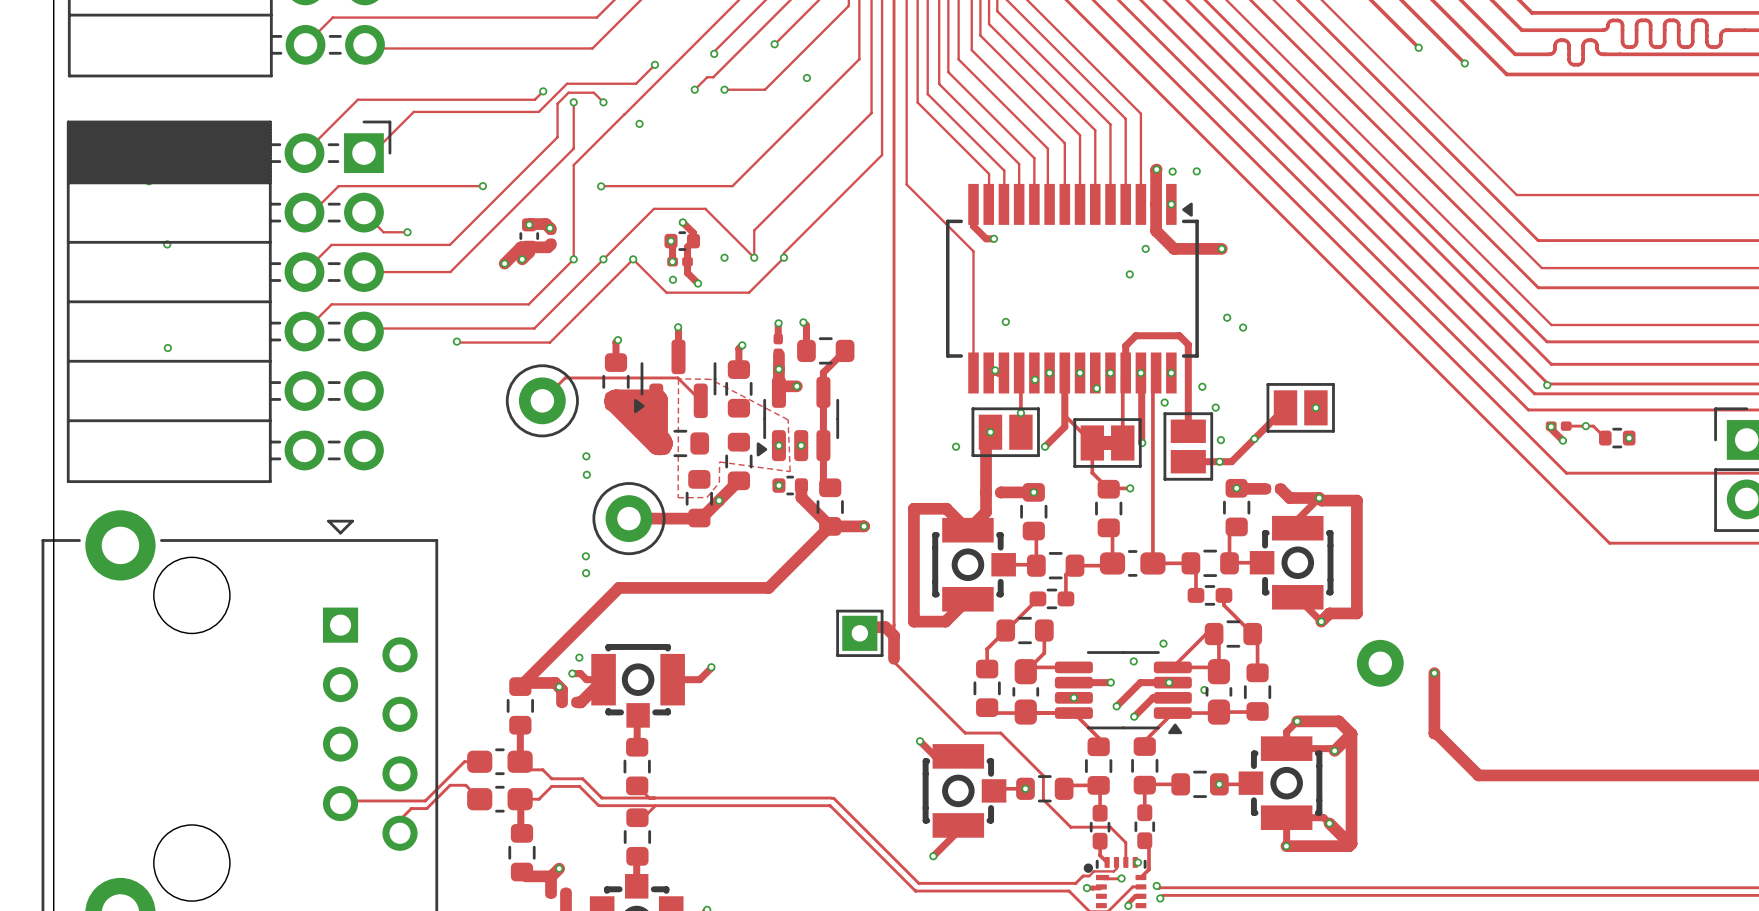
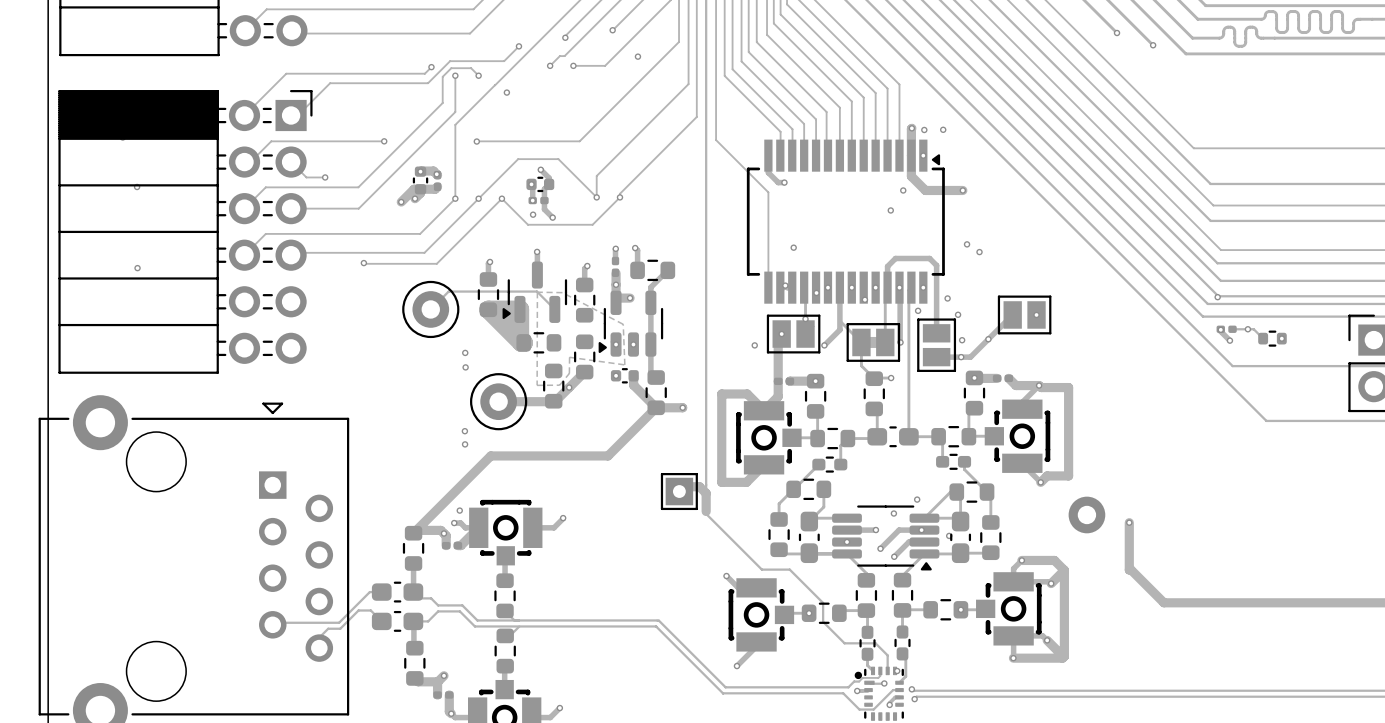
via: (724, 257) -> none

